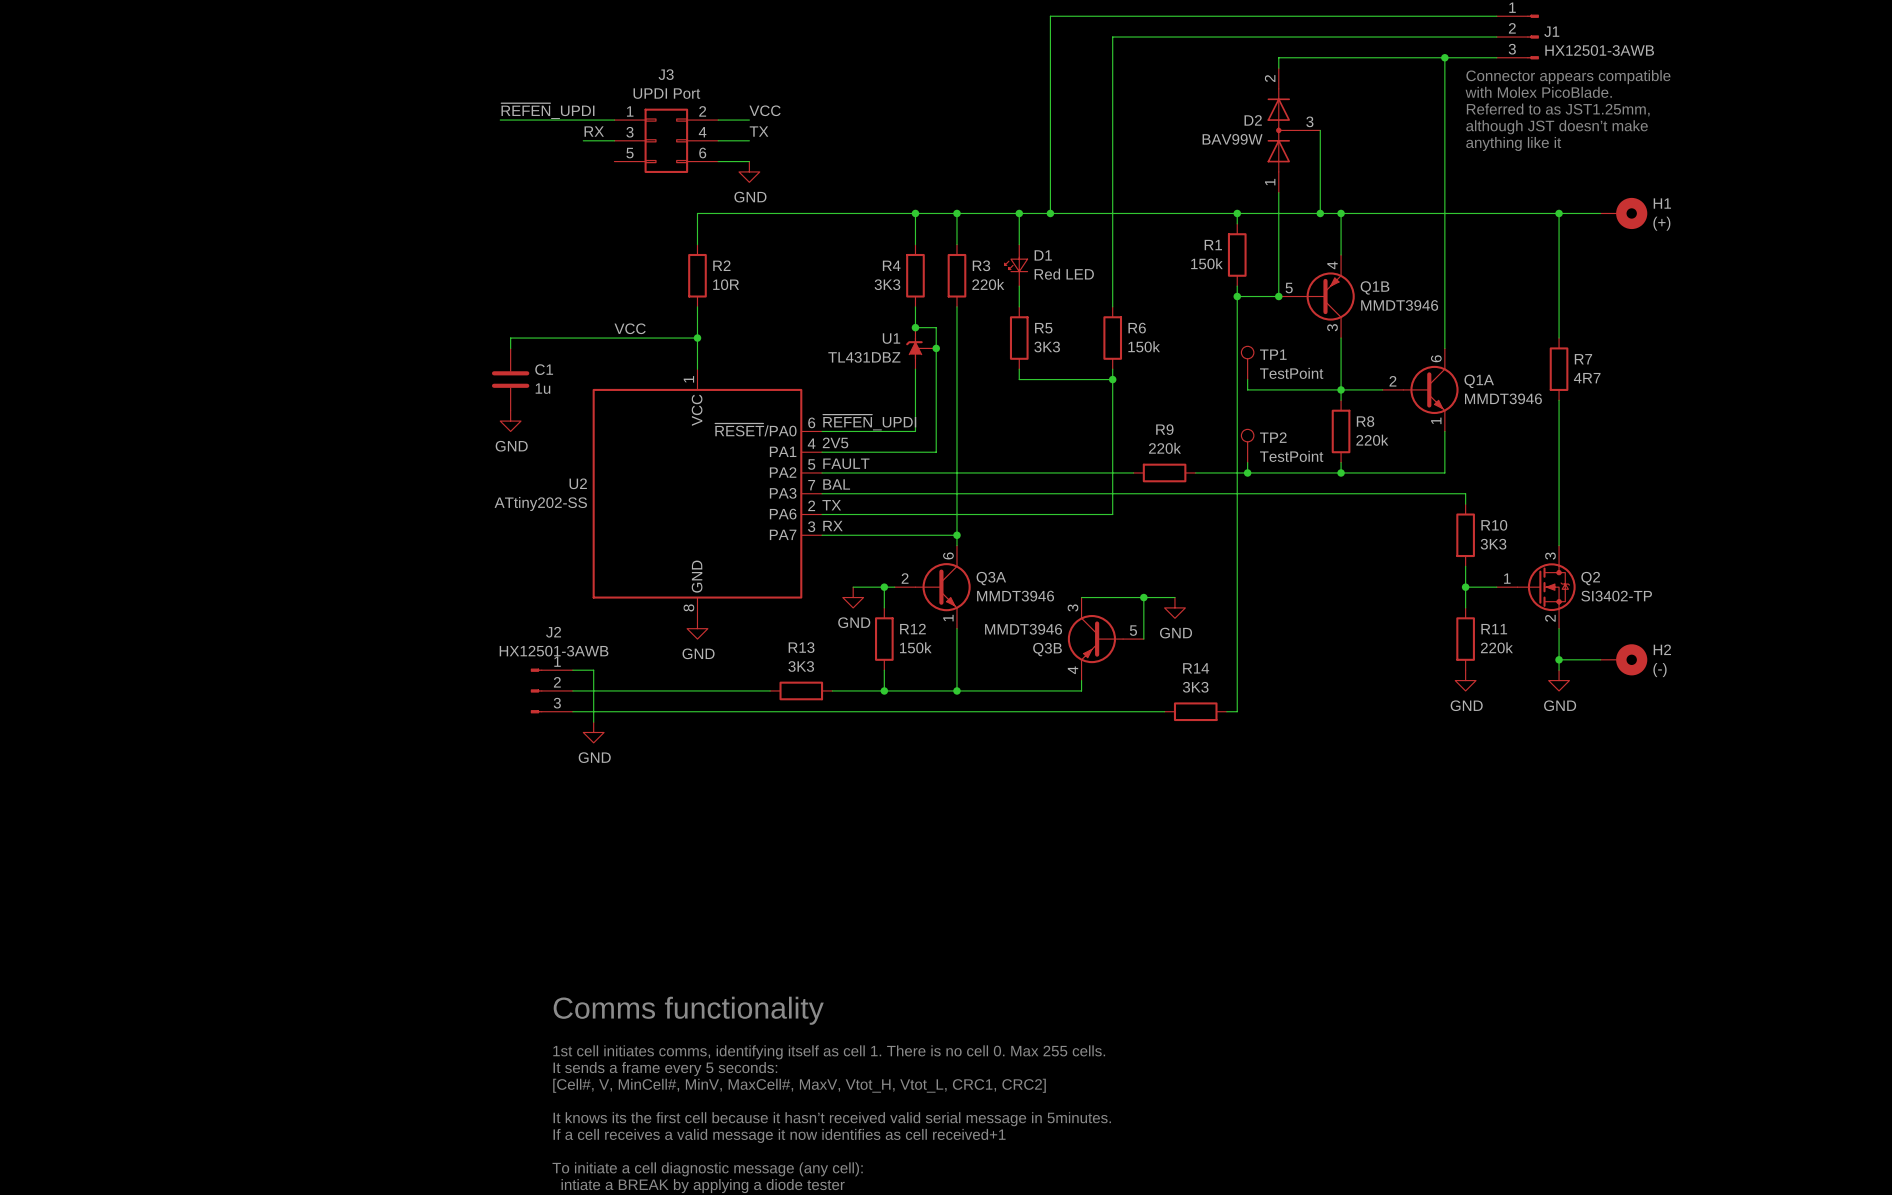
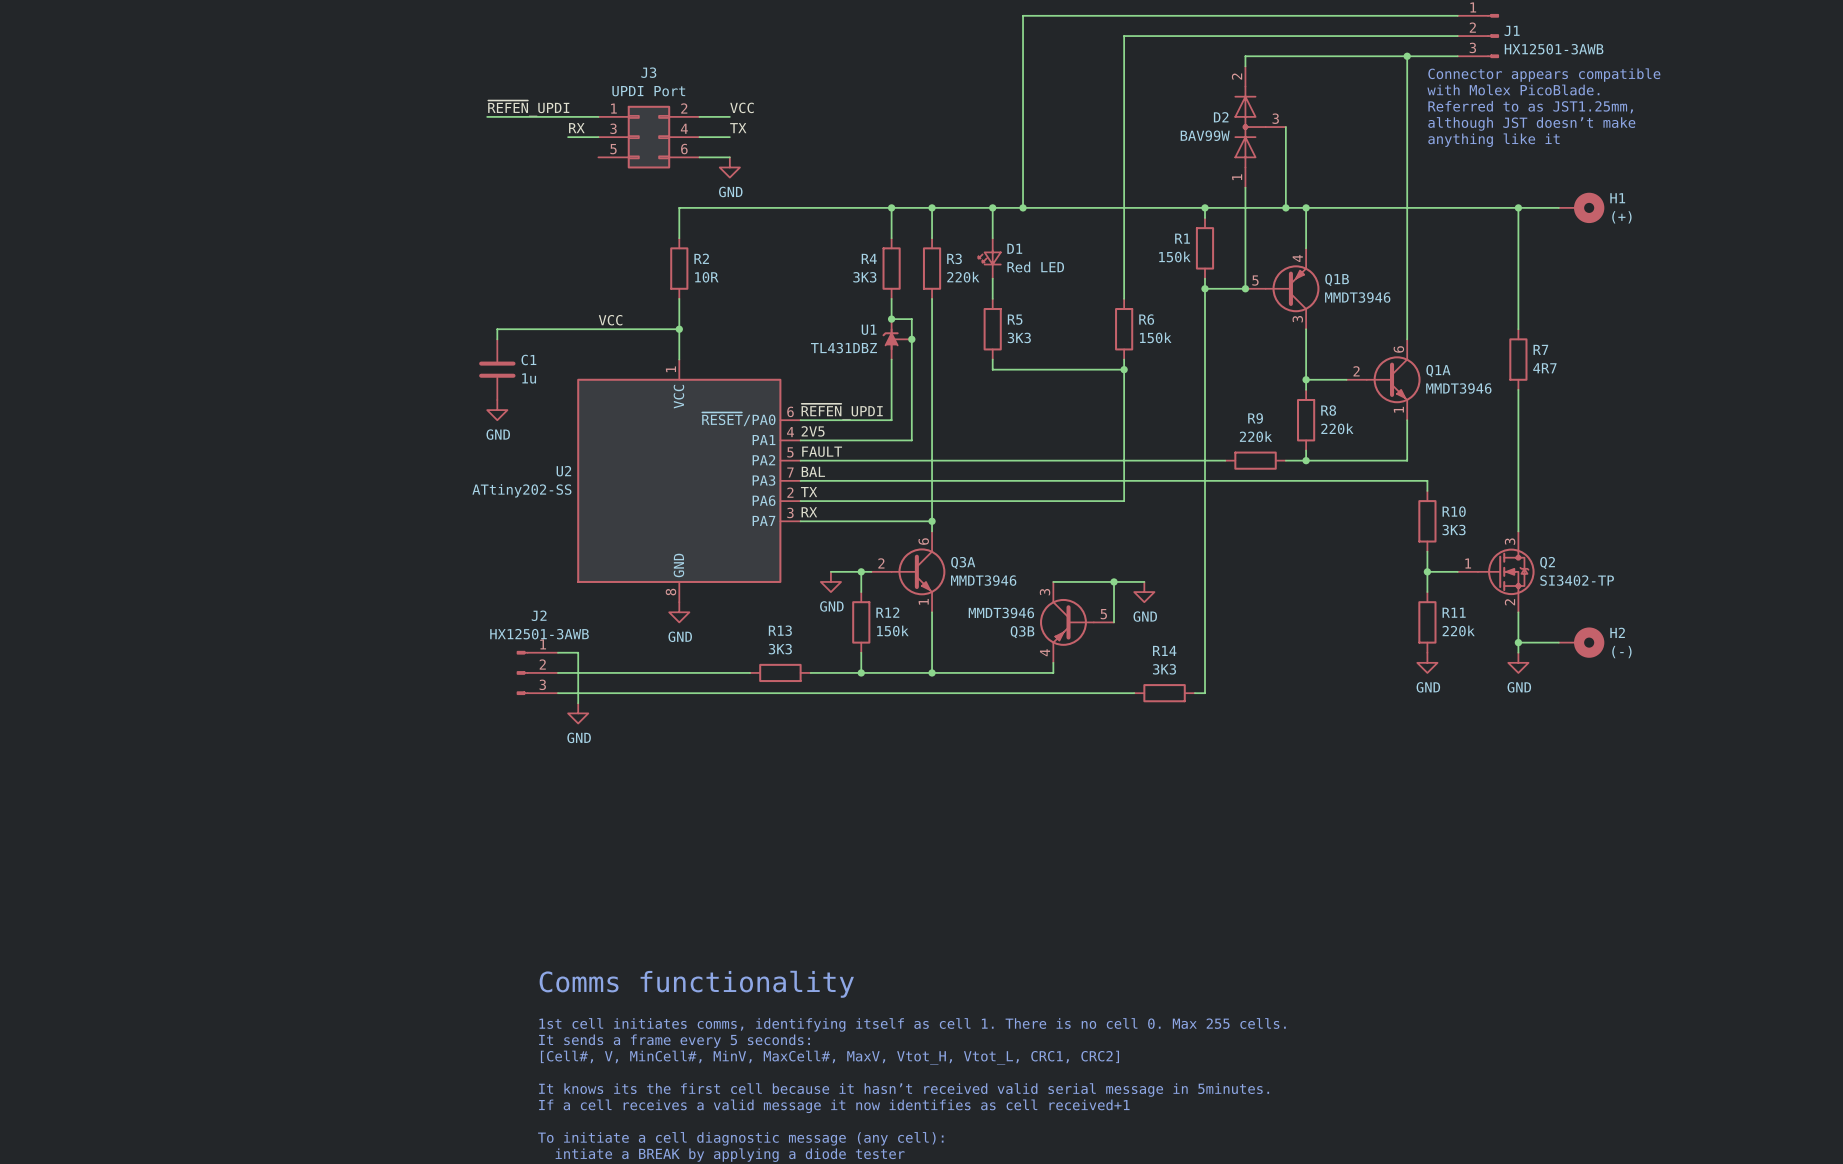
wire: (1154, 37) (1112, 37) (1112, 306) -> (1124, 36) (1124, 298)
R6 position: (1112, 338) -> (1124, 329)
TP1: TestPoint (1247, 362) -> none
wire: (1112, 369) (1112, 514) -> (1124, 359) (1124, 501) (1083, 501)
wire: none -> (1083, 369) (1124, 369)
junction position: (1112, 379) -> (1124, 369)
wire: (1247, 379) (1247, 389) (1341, 389) -> none
TP2: TestPoint (1247, 445) -> none
wire: (1247, 462) (1247, 472) -> none
R9 position: (1164, 472) -> (1255, 460)
junction: (1247, 472) -> none
wire: (1258, 472) (1320, 472) -> (1103, 460) (1164, 460)

